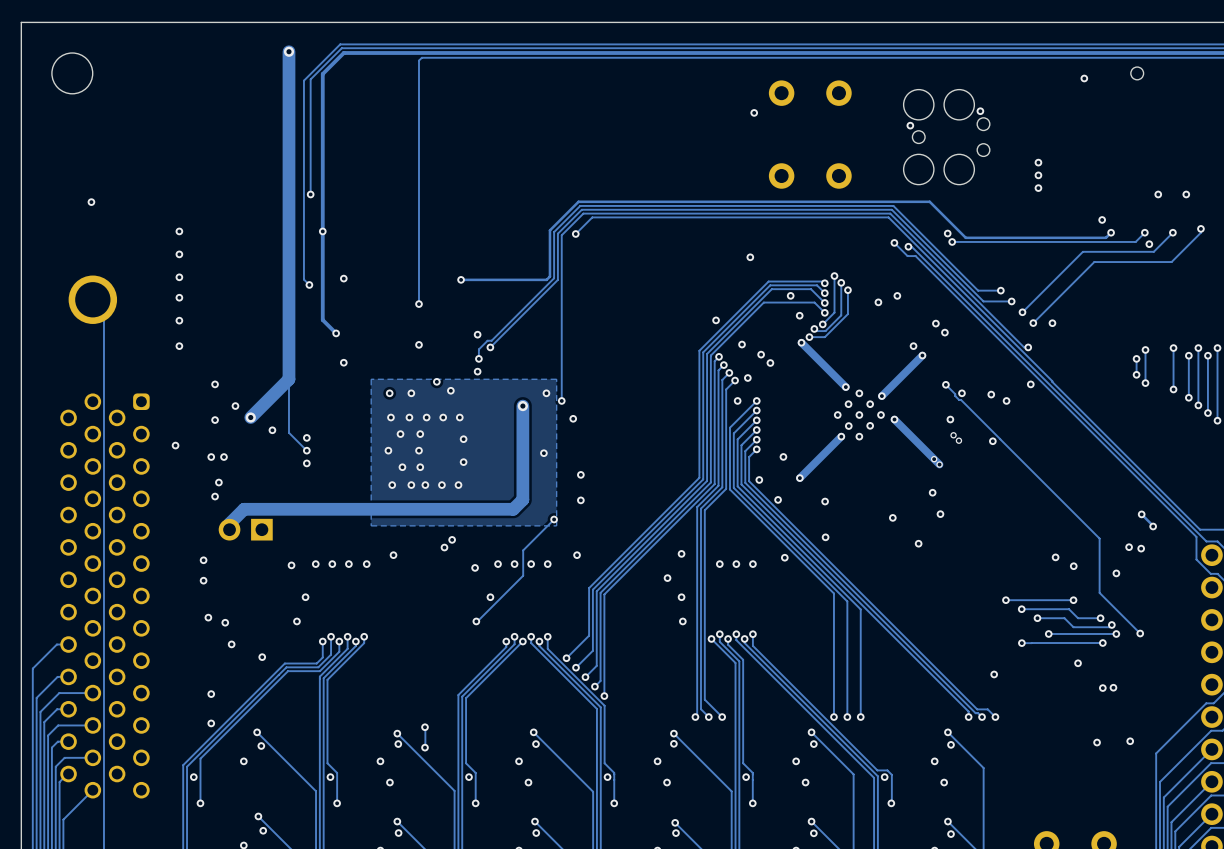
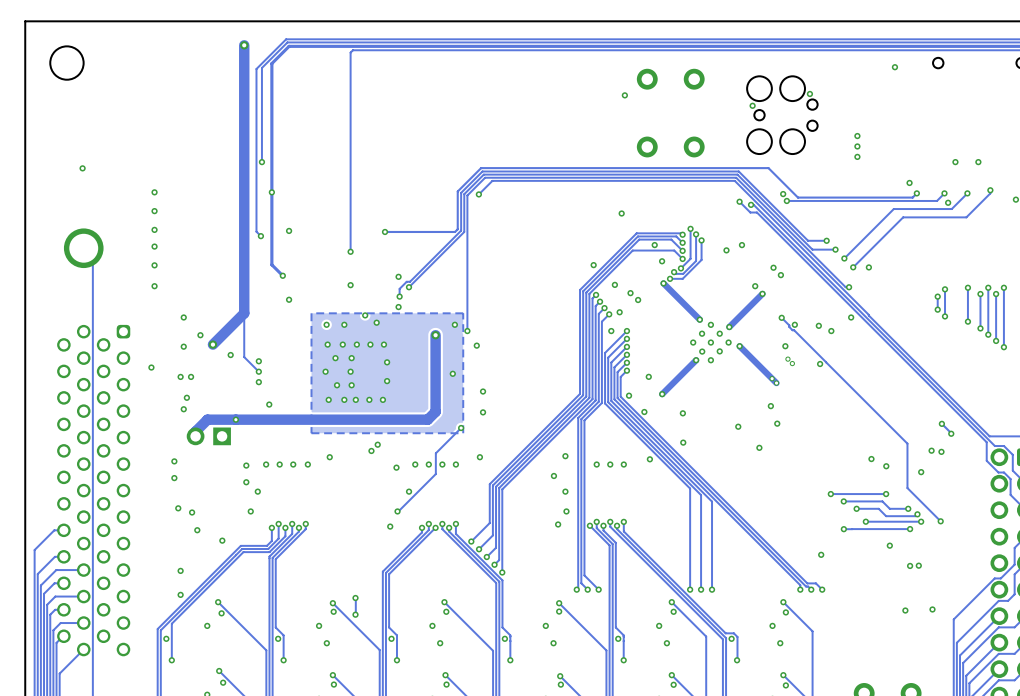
via: none -> (269, 404)
via: none -> (235, 419)
via: none -> (246, 482)
via: none -> (558, 524)
via: none -> (390, 526)

